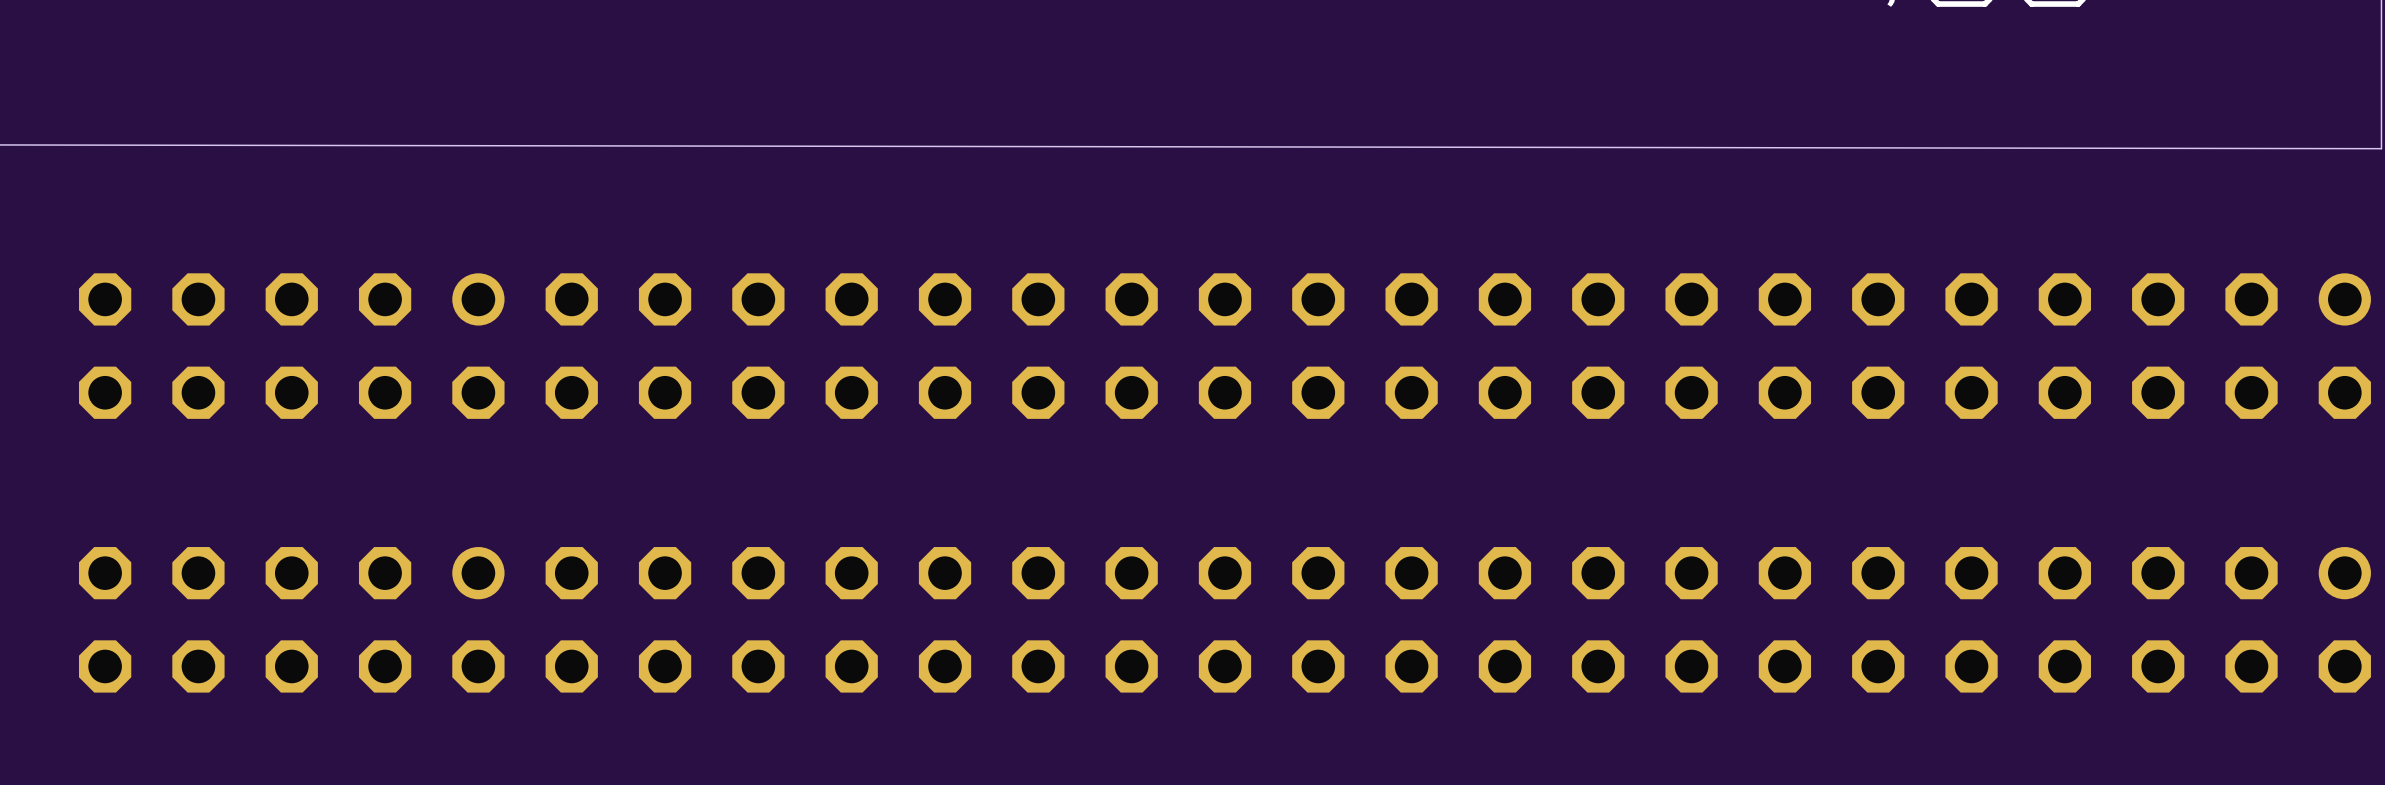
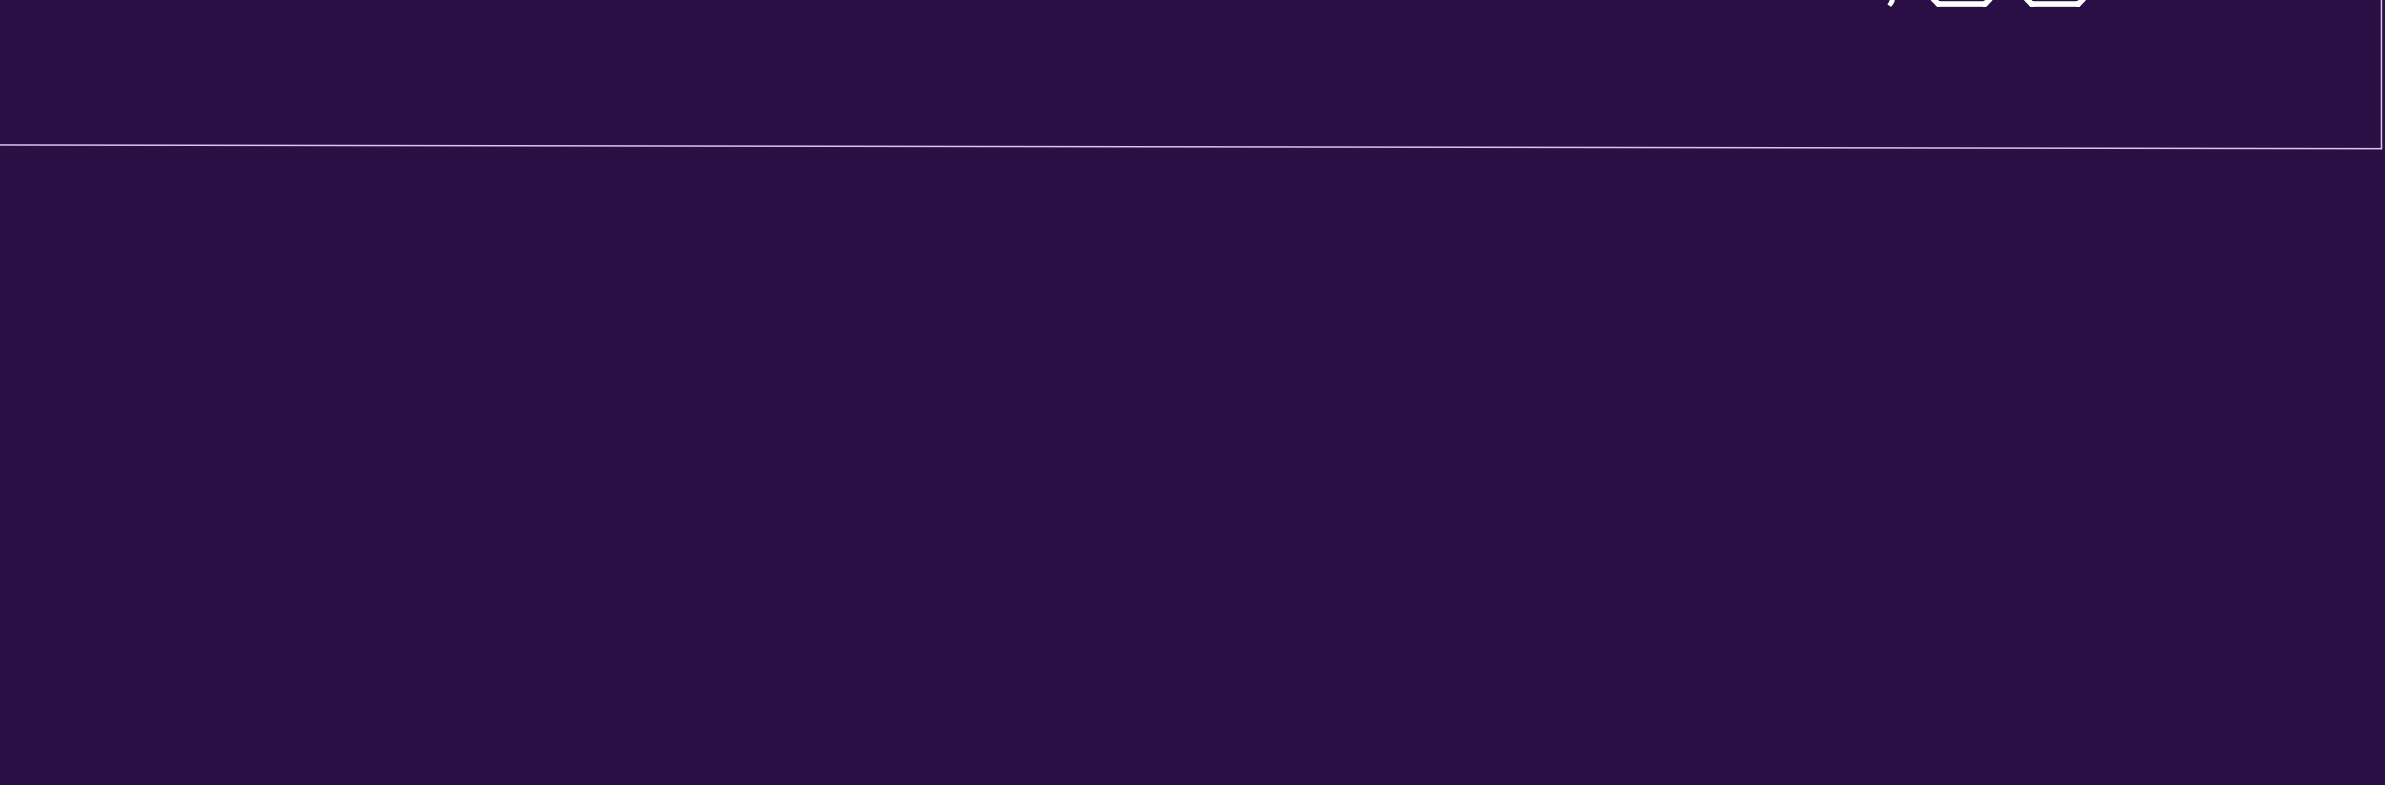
part: (1224, 346) -> none
part: (1224, 619) -> none

